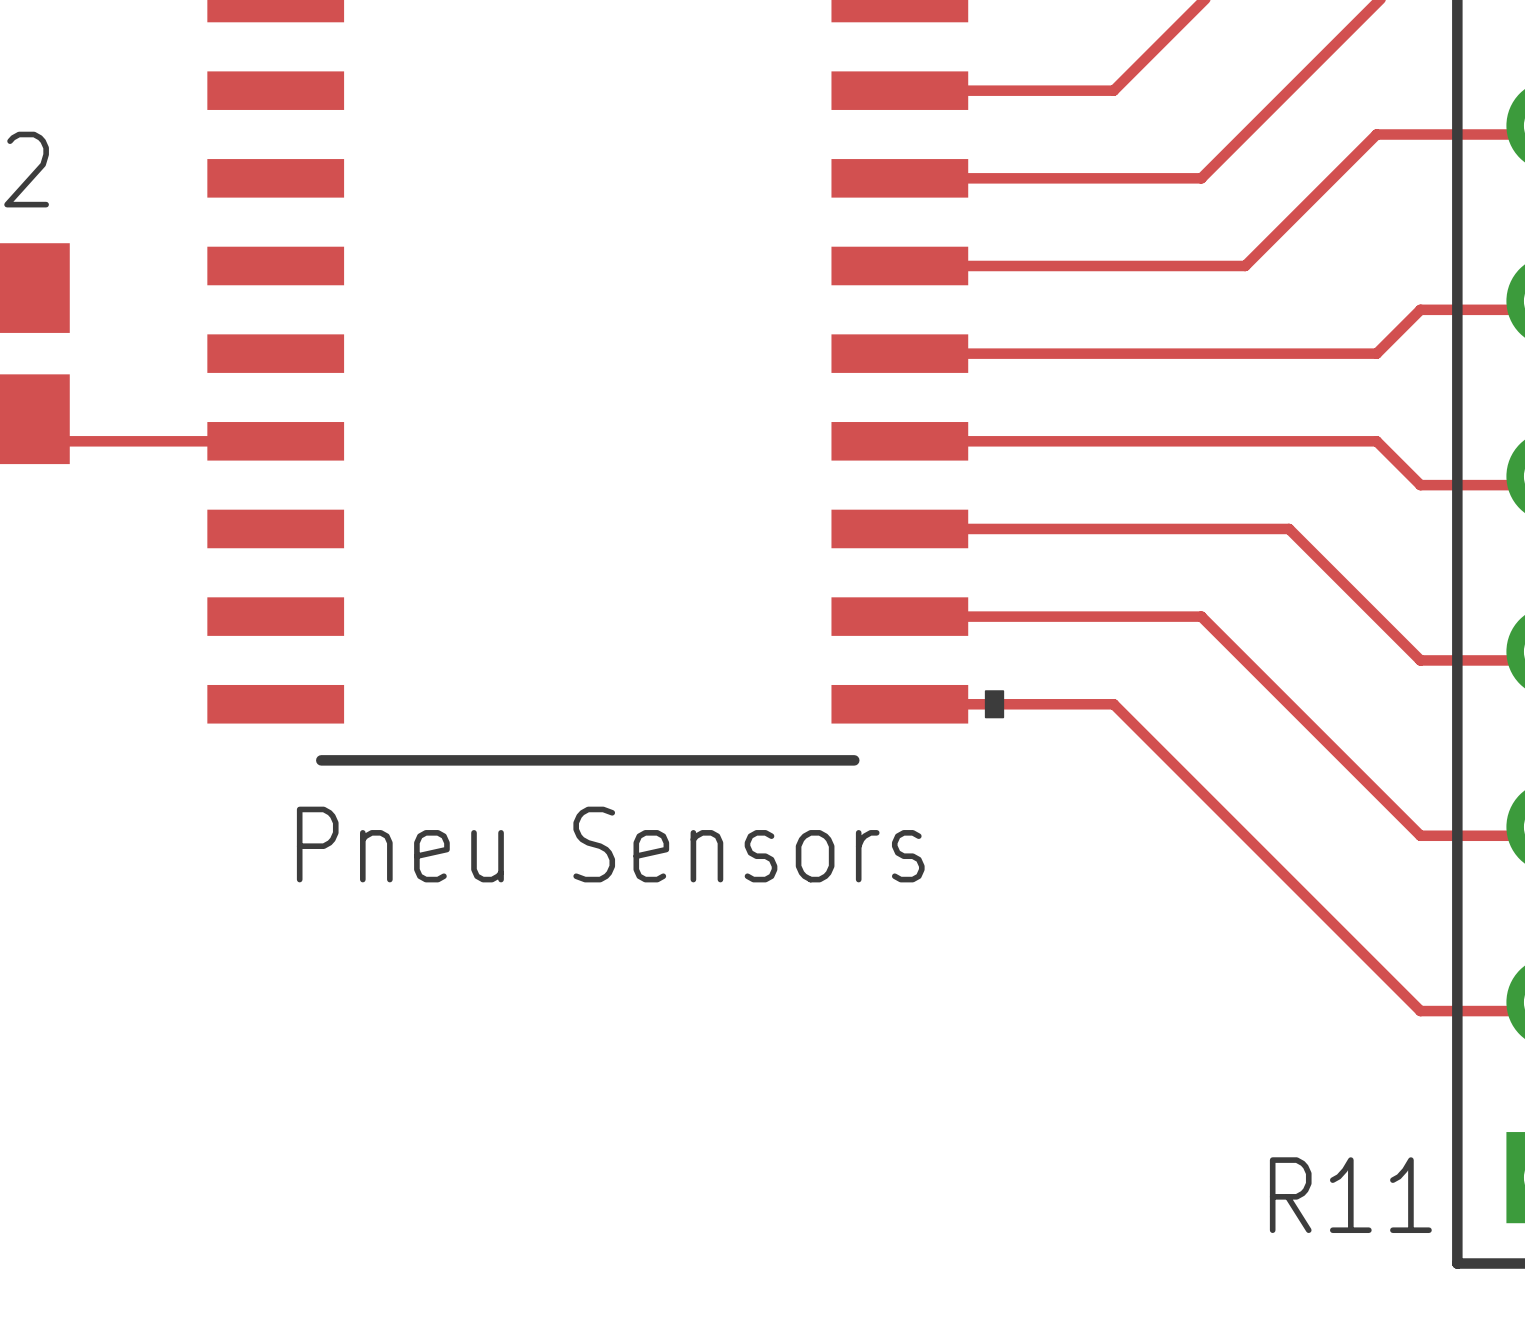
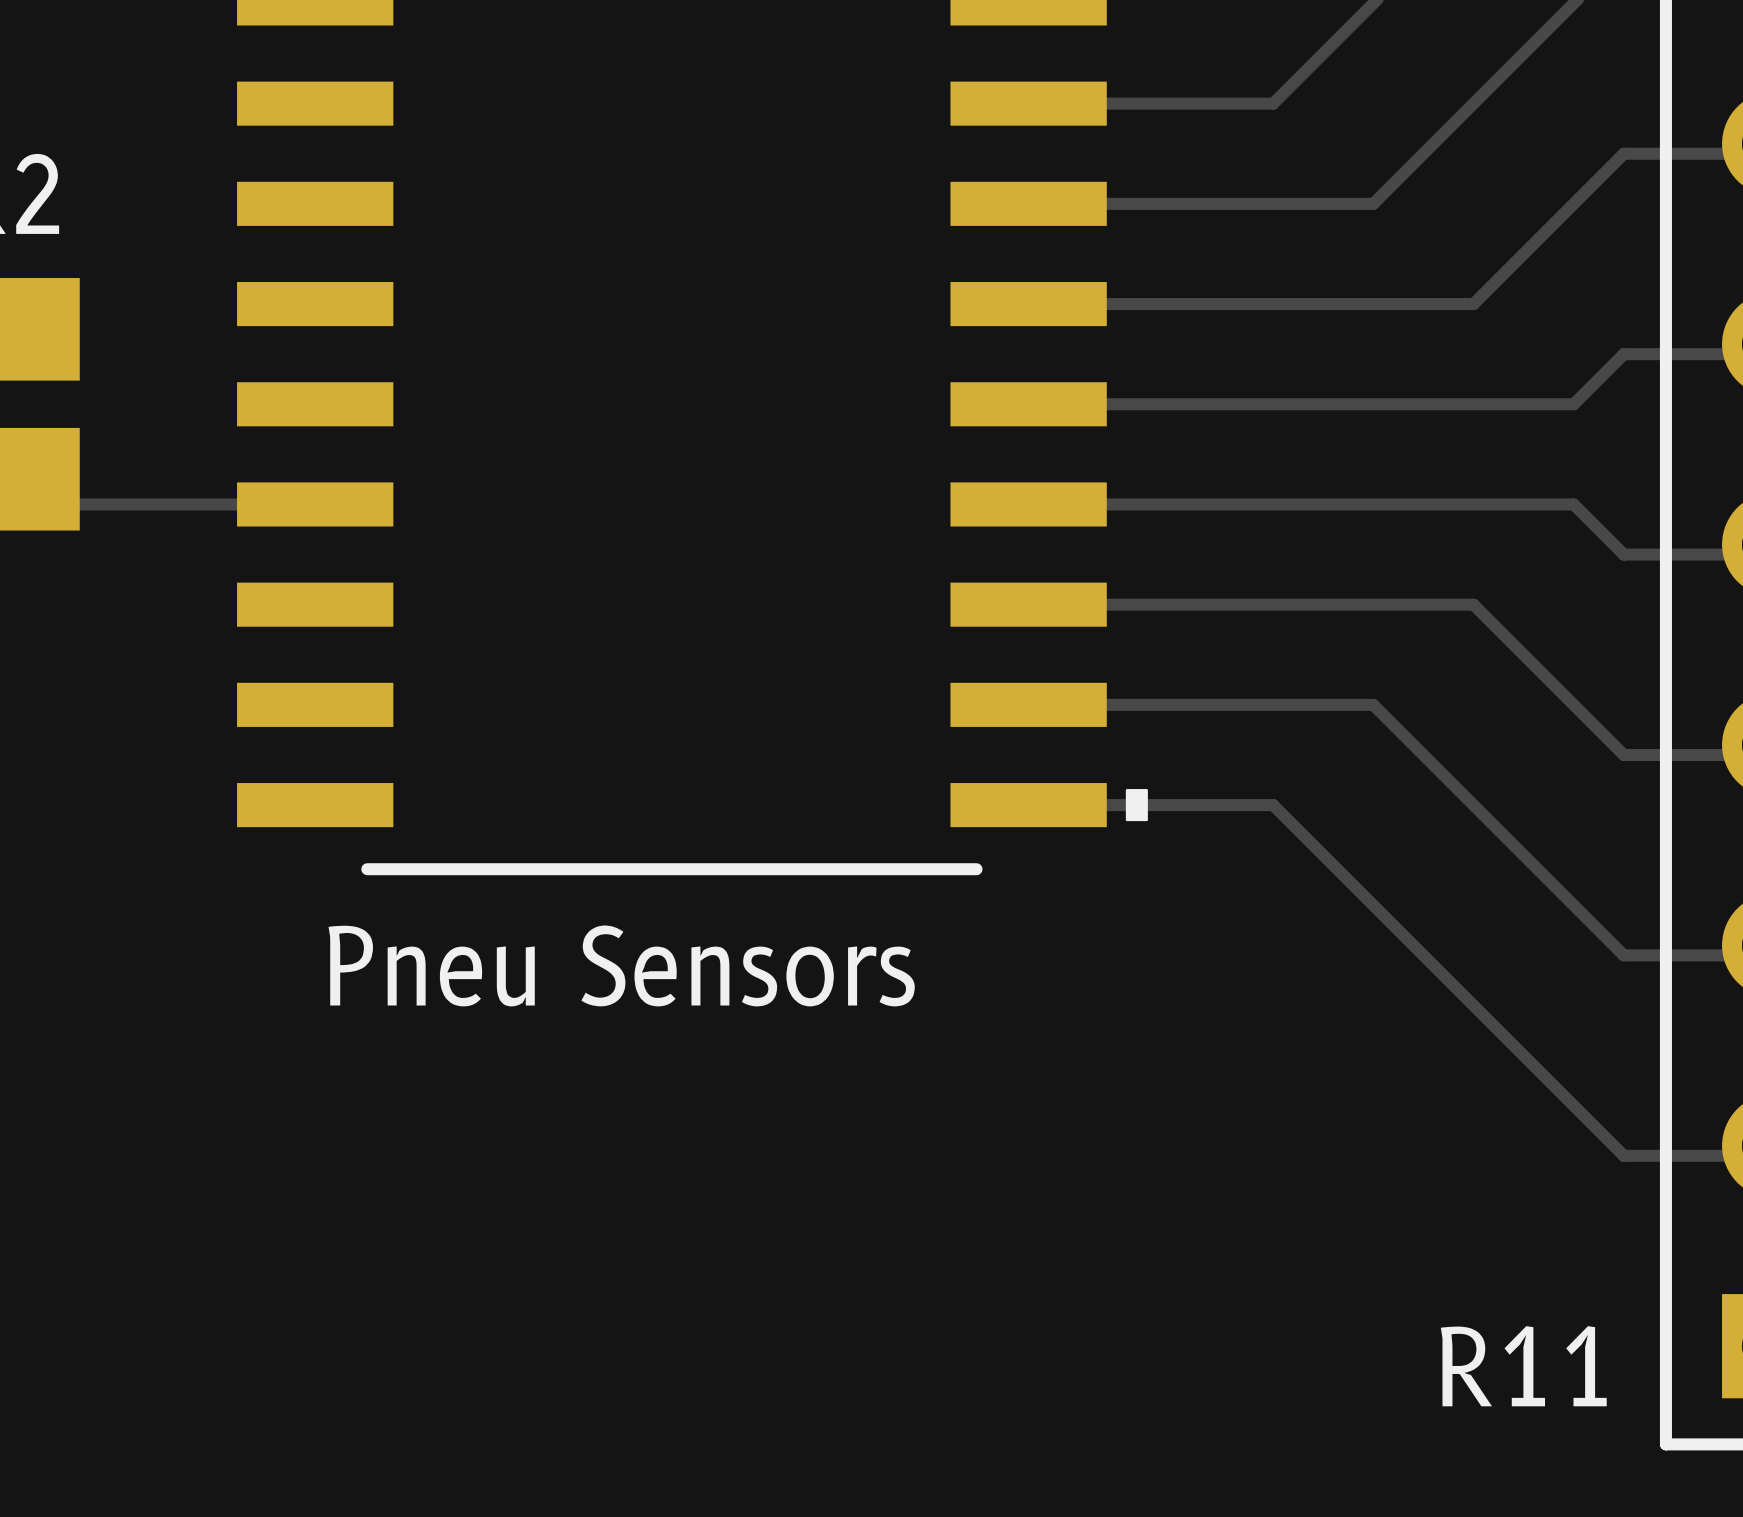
track: (1420, 134) (1376, 134) (1245, 265) -> (1623, 153) (1473, 304) (1423, 304)

